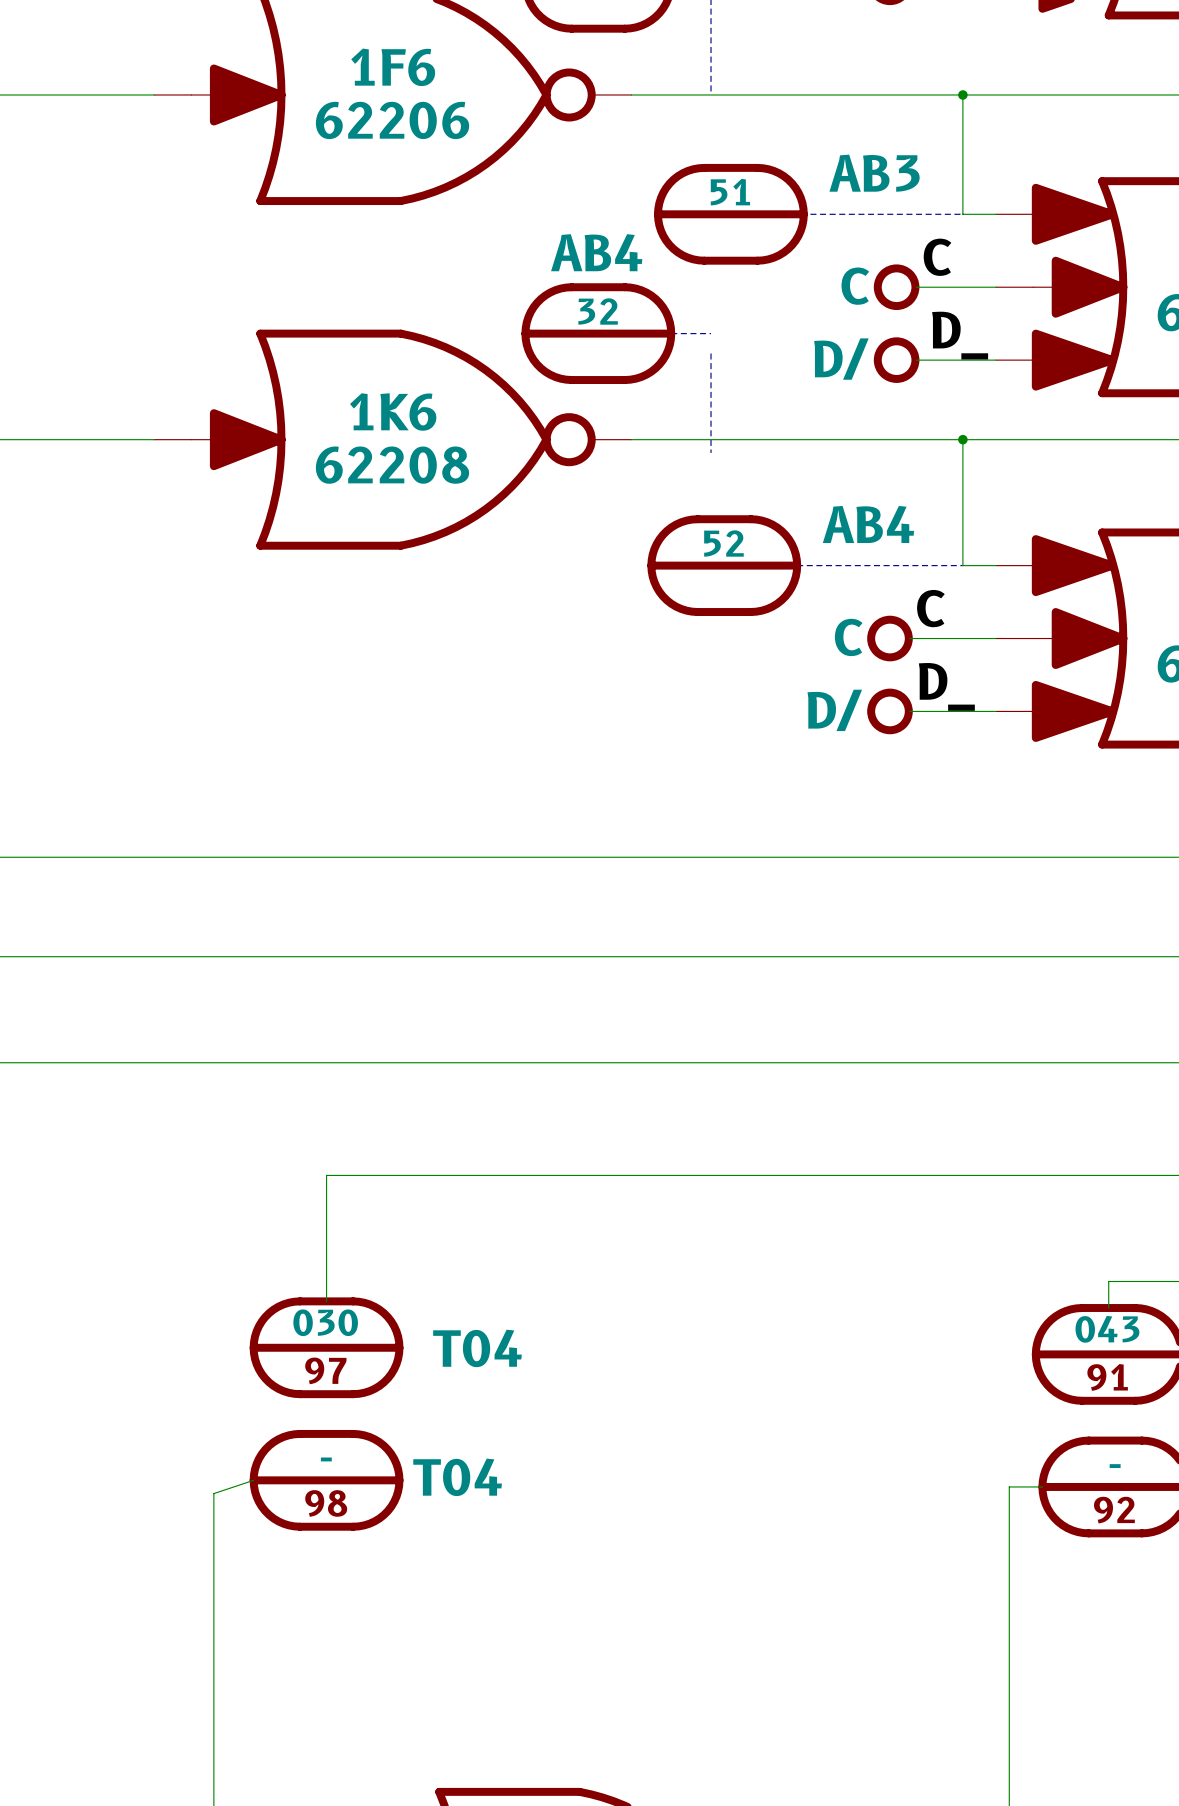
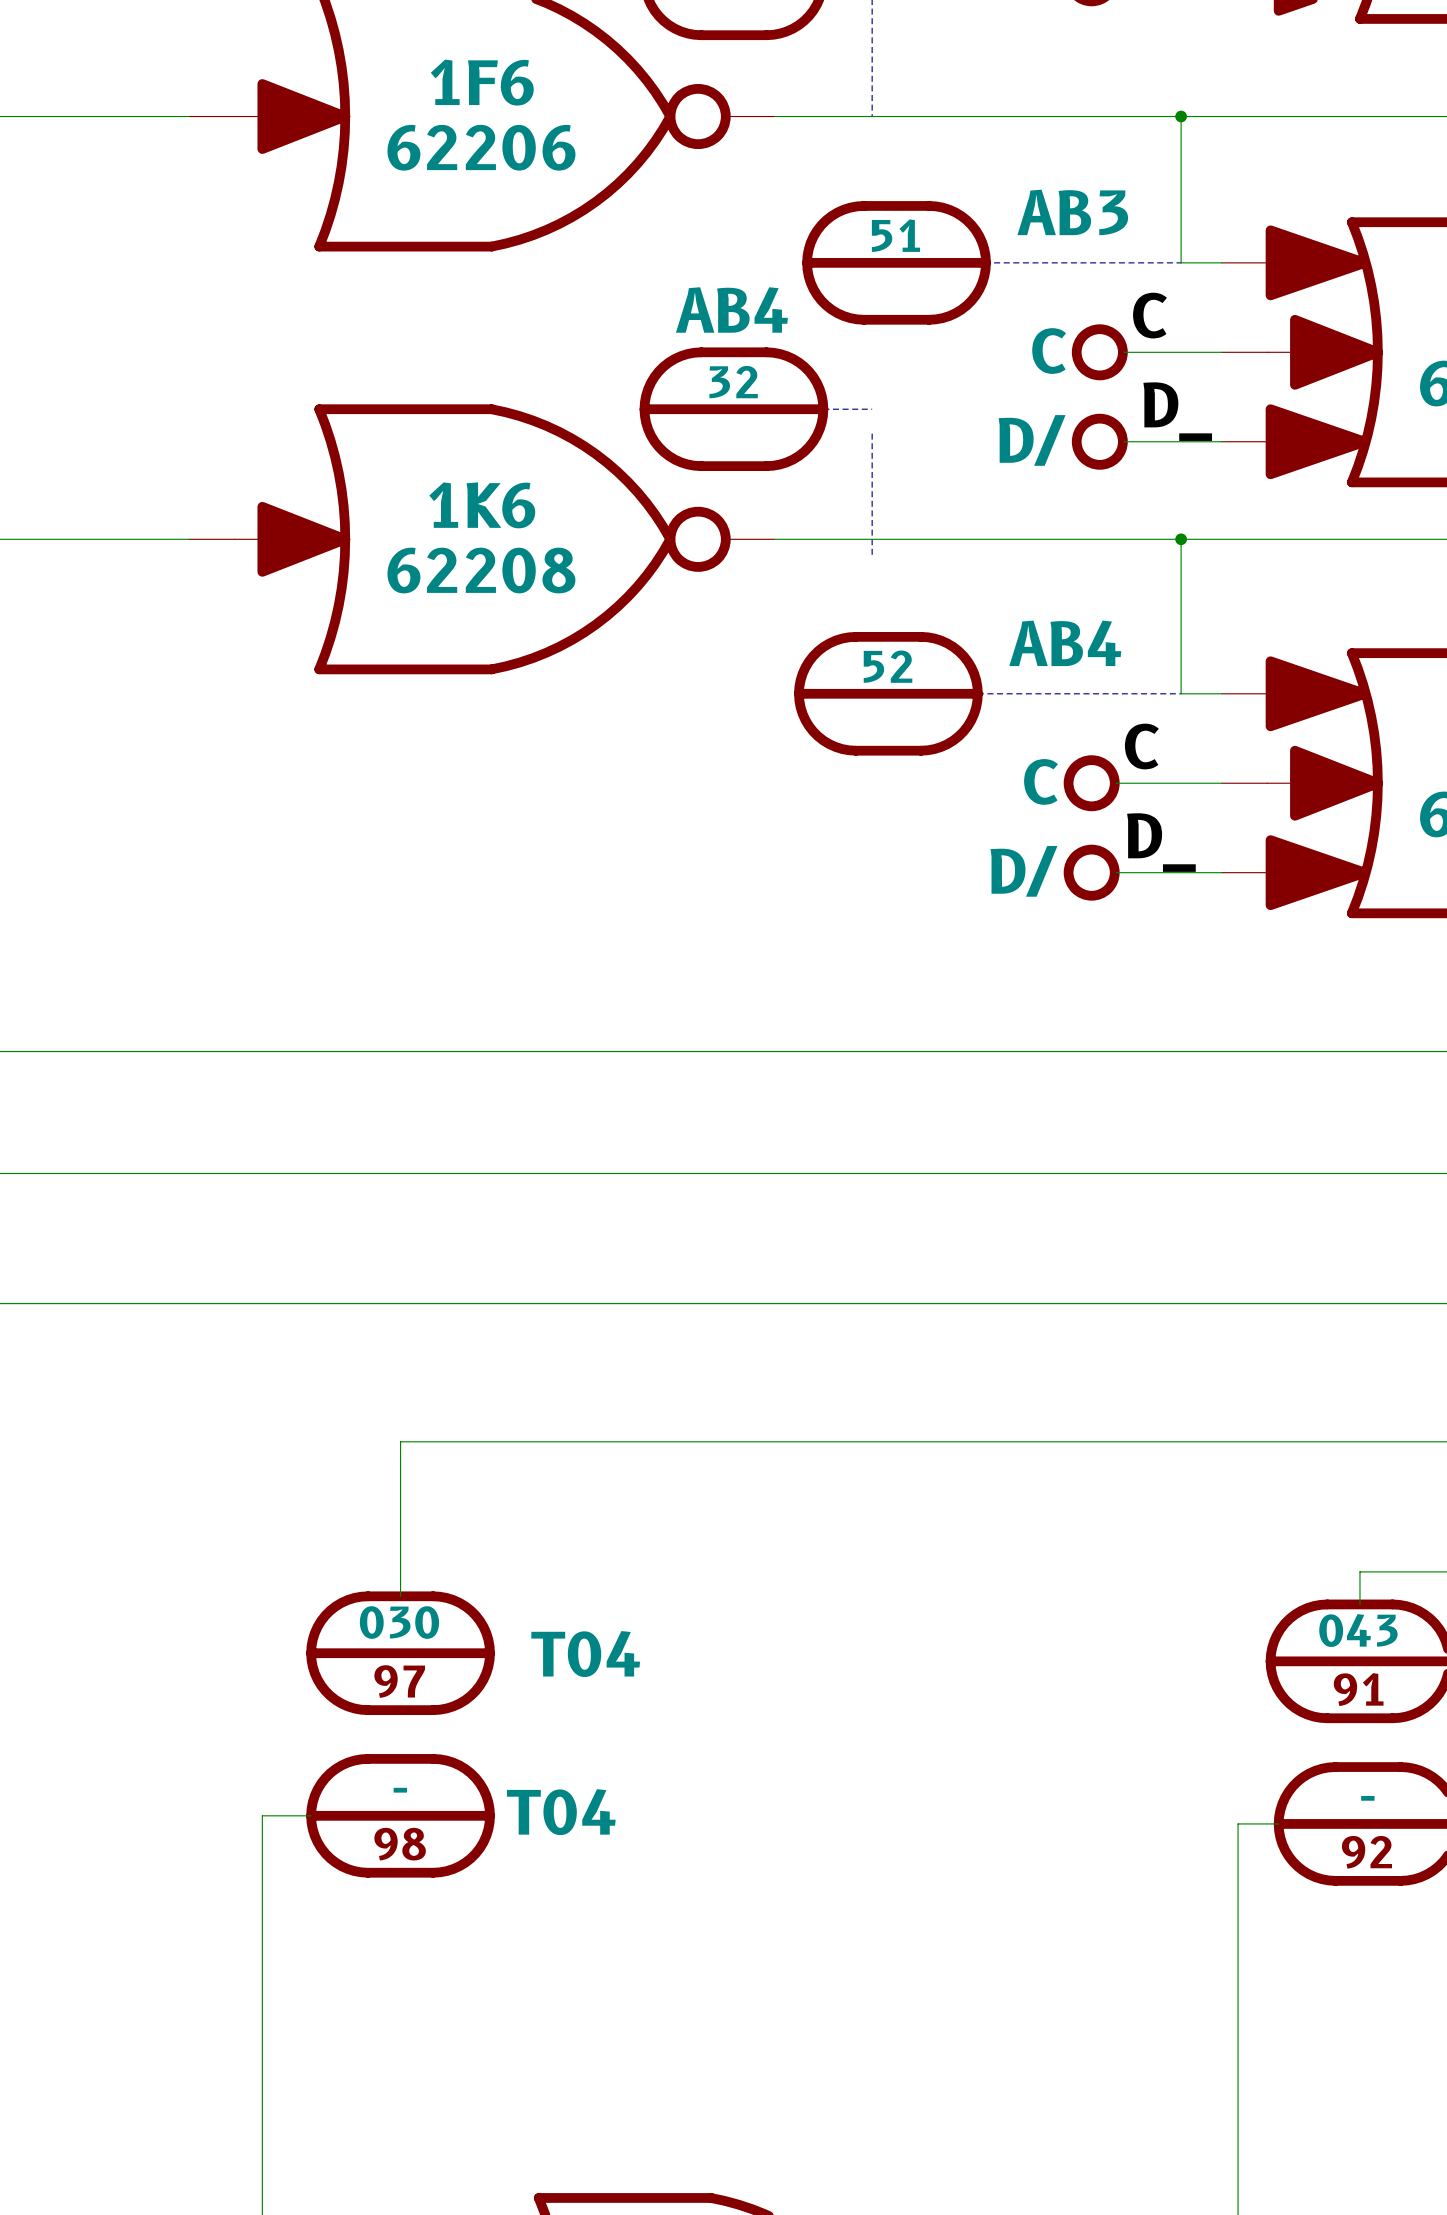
wire: (253, 1480) (213, 1493) -> (311, 1815) (262, 1815) (262, 1832)

